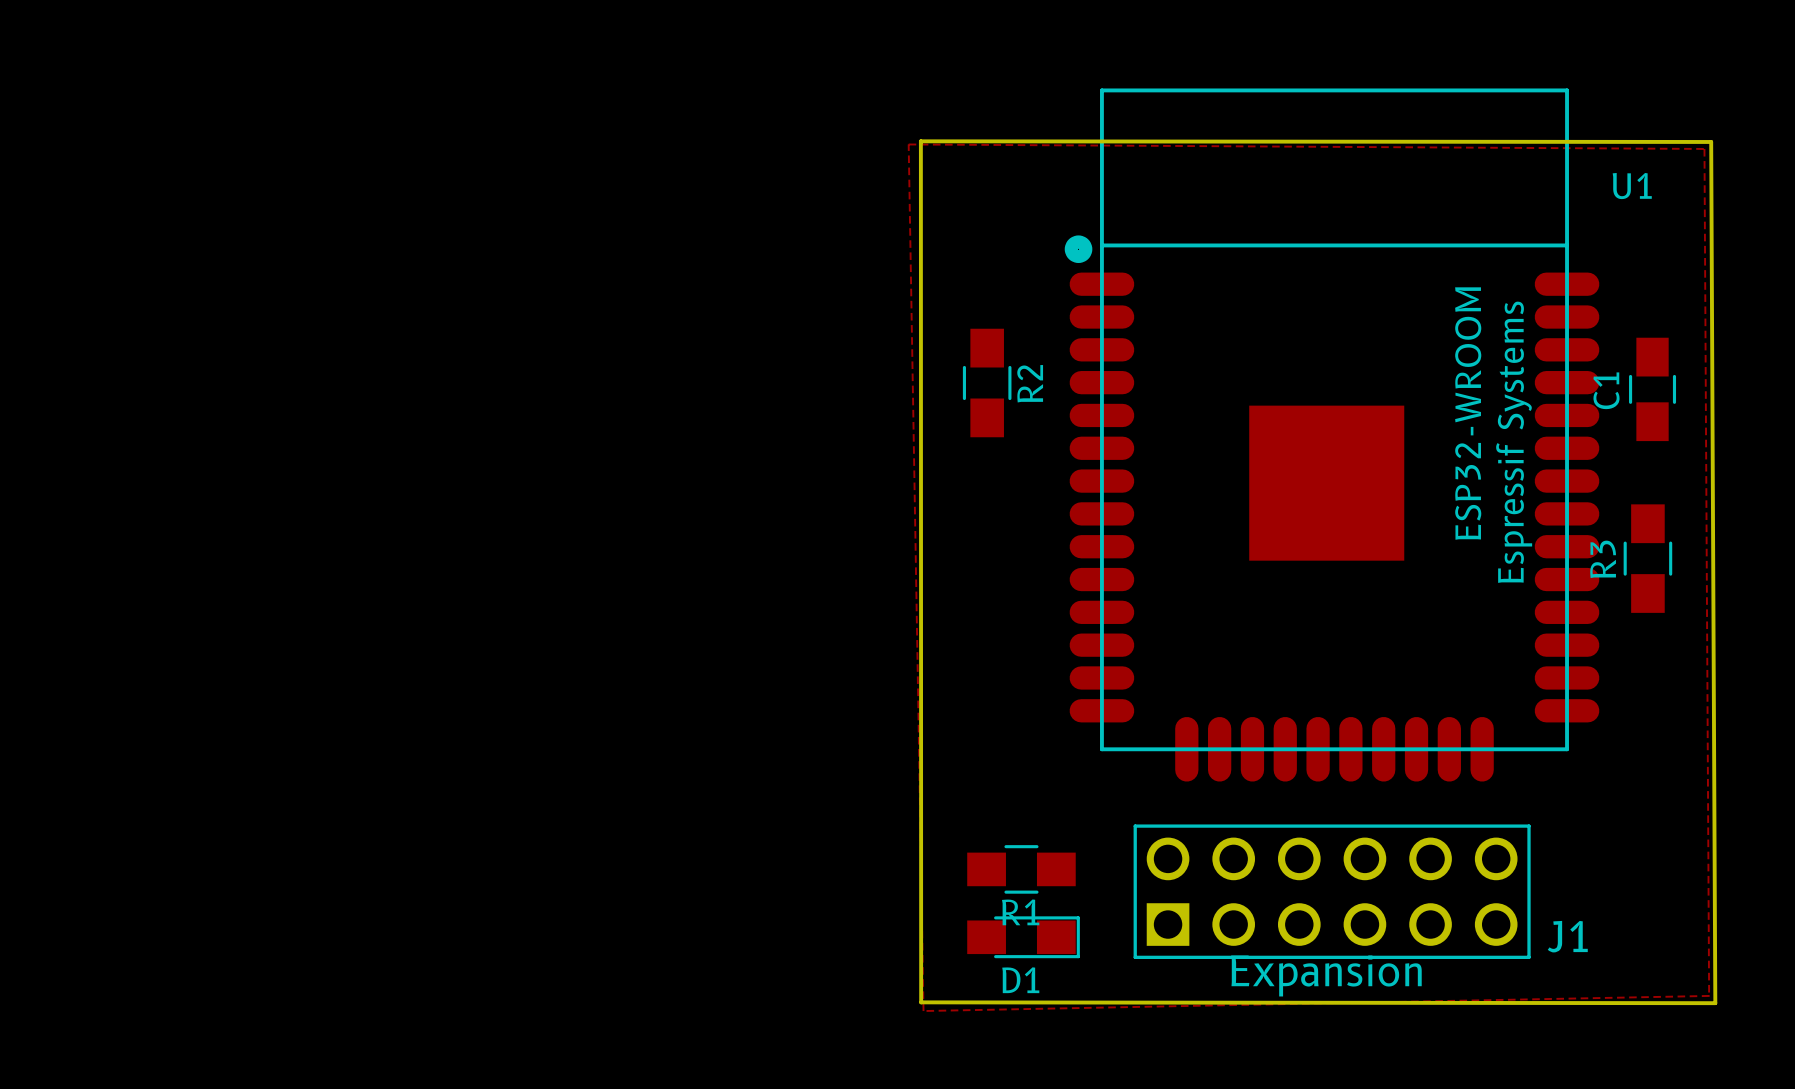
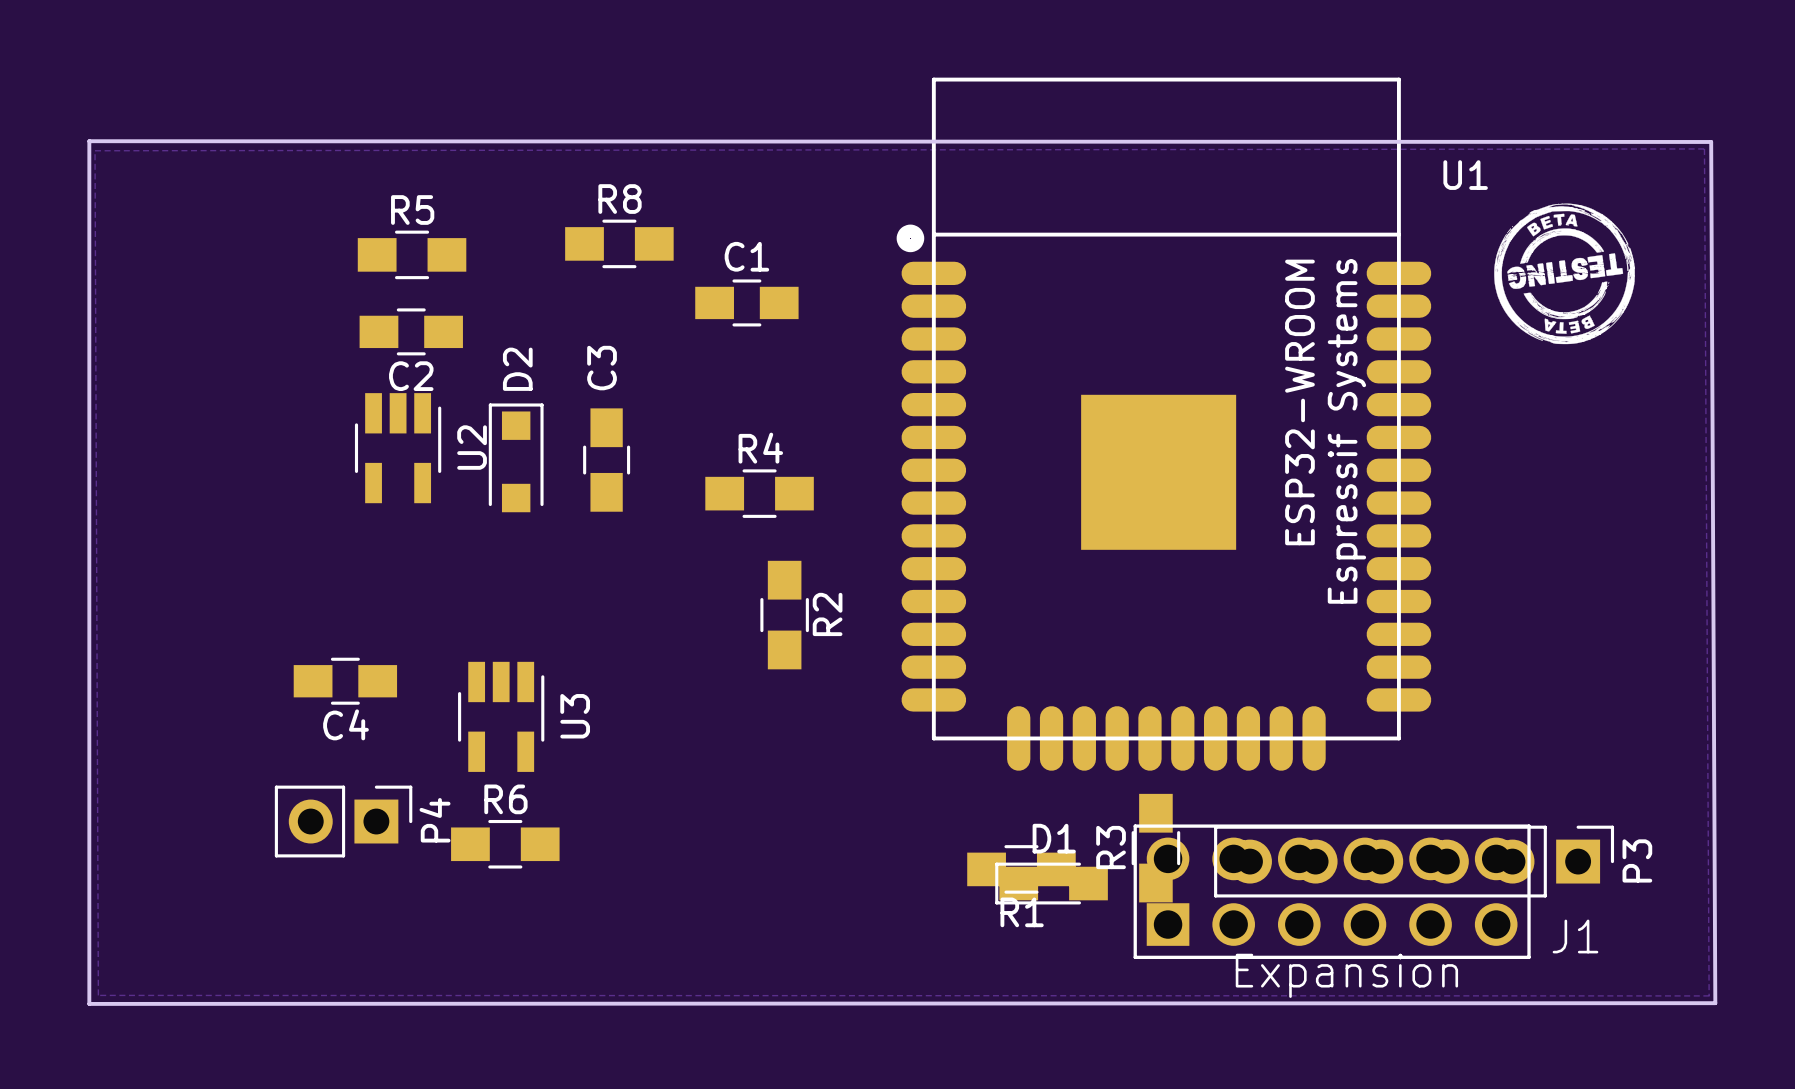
board edge: (1711, 141) (920, 141) (921, 1002) (1715, 1003) -> (1711, 141) (89, 141) (89, 1003) (1715, 1003)
zone outline: (1704, 148) (908, 144) (923, 1011) (1709, 995) -> (1704, 148) (95, 150) (98, 995) (1709, 995)
drawing: none -> [1494, 203, 1635, 345]
R8: none -> (619, 243)
R5: none -> (412, 254)
C2: none -> (411, 331)
R2 position: (987, 383) -> (784, 615)
C1 rotation: 0° (1652, 389) -> 90° clockwise (746, 302)
C1 position: (1652, 389) -> (746, 302)
U1 position: (1332, 435) -> (1163, 424)
U2: none -> (398, 448)
D2: none -> (516, 457)
C3: none -> (606, 460)
R4: none -> (759, 493)
R3 position: (1647, 558) -> (1155, 848)
C4: none -> (345, 681)
U3: none -> (501, 716)
P4: none -> (343, 821)
R6: none -> (505, 844)
P3: none -> (1414, 861)
D1 rotation: 0° (1023, 937) -> 180° (1051, 883)

